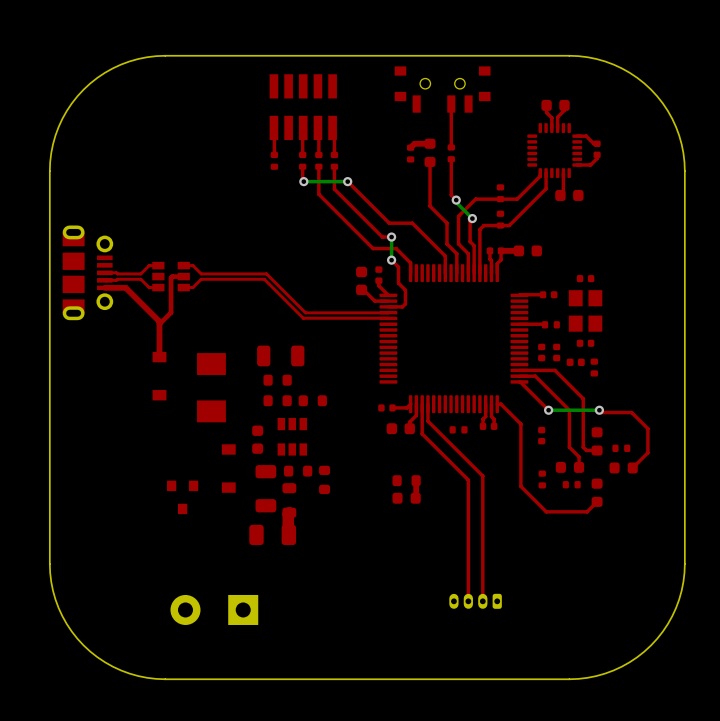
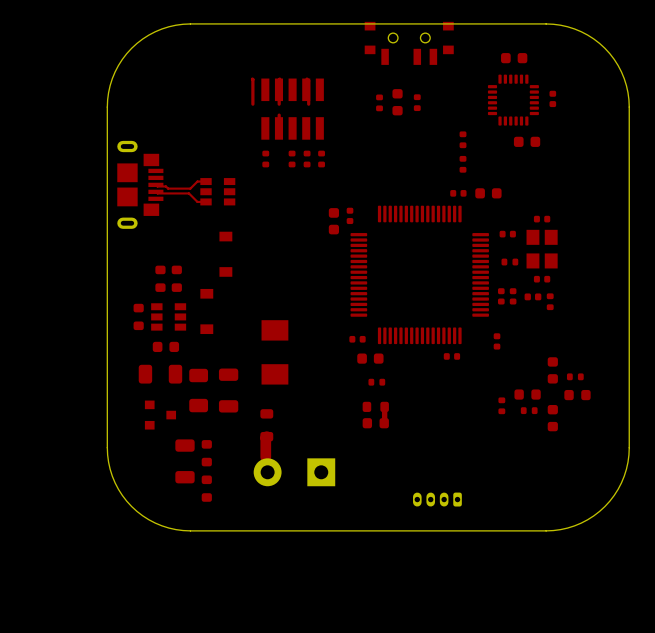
board edge: (569, 55) (156, 56) (129, 61) (112, 68) (97, 77) (77, 96) (58, 127) (50, 162) (49, 563) (51, 581) (58, 607) (71, 631) (90, 651) (121, 670) (156, 678) (569, 679) (587, 677) (613, 670) (637, 657) (657, 638) (676, 607) (684, 572) (683, 153) (676, 127) (667, 110) (644, 83) (613, 64) (587, 57) (569, 55) -> (546, 23) (574, 28) (599, 43) (618, 65) (627, 92) (628, 455) (621, 482) (609, 501) (599, 511) (581, 523) (567, 528) (546, 530) (183, 530) (162, 525) (137, 511) (122, 495) (115, 482) (108, 462) (107, 447) (107, 99) (112, 78) (126, 53) (148, 35) (168, 26) (183, 24) (546, 23)
top track: (451, 104) (451, 147) -> none
top track: (546, 105) (546, 112) (551, 117) (551, 128) -> none
top track: (564, 105) (564, 110) (557, 117) (557, 128) -> none
part: (303, 107) -> none
top track: (317, 127) (318, 154) -> none
top track: (577, 136) (586, 136) (593, 143) (597, 143) -> none
top track: (430, 143) (414, 143) (410, 147) -> none
part footprint: [315, 151, 323, 170] -> [261, 78, 324, 140]
top track: (597, 154) (597, 158) (590, 165) (577, 165) -> none
top track: (451, 159) (451, 195) (456, 200) -> none
part: (274, 160) -> none
part: (302, 160) -> none
part: (334, 160) -> none
top track: (430, 161) (430, 206) (447, 223) (447, 243) (456, 253) (456, 273) -> none
top track: (318, 166) (318, 194) (373, 248) (396, 248) (410, 263) (410, 273) -> none
top track: (334, 166) (334, 189) (382, 237) (391, 237) -> none
top track: (540, 173) (540, 176) (517, 199) (475, 199) (458, 216) (458, 243) (468, 253) (468, 273) -> none
top track: (546, 173) (546, 188) (509, 225) (483, 225) (479, 229) (479, 273) -> none
top track: (563, 173) (563, 192) (560, 195) -> none
via: (303, 181) -> none
top track: (347, 181) (389, 223) (412, 223) (445, 256) (445, 273) -> none
bottom track: (347, 181) (303, 181) -> none
via: (347, 181) -> none
bottom track: (456, 200) (456, 202) (472, 218) -> none
via: (456, 200) -> none
part: none -> (265, 159)
part: none -> (292, 159)
part: none -> (307, 159)
part: none -> (321, 159)
top track: (472, 218) (470, 220) (470, 241) (474, 245) (474, 273) -> none
via: (472, 218) -> none
bottom track: (391, 237) (391, 260) -> none
via: (391, 237) -> none
top track: none -> (206, 181) (197, 181) (190, 188) (168, 188) (155, 184)
part: none -> (140, 184)
top track: none -> (156, 191) (157, 193) (189, 193) (197, 201) (206, 201)
part: none -> (217, 191)
top track: (489, 250) (491, 273) -> none
top track: (518, 250) (501, 250) (501, 259) (497, 263) (497, 273) -> none
top track: (391, 260) (398, 267) (398, 283) (405, 290) (405, 304) (402, 306) (388, 306) -> none
via: (391, 260) -> none
top track: (158, 265) (149, 265) (140, 273) (104, 272) -> none
top track: (183, 265) (192, 265) (201, 273) (266, 273) (305, 312) (388, 312) -> none
part: (87, 272) -> none
part: (171, 276) -> none
top track: (183, 276) (171, 278) (171, 312) (159, 324) -> none
top track: (104, 280) (140, 279) (149, 287) (158, 287) -> none
top track: (378, 280) (378, 285) (388, 295) -> none
top track: (104, 287) (125, 287) (159, 321) (159, 357) -> none
top track: (183, 287) (192, 287) (201, 279) (264, 279) (303, 318) (388, 318) -> none
top track: (361, 289) (374, 301) (388, 301) -> none
top track: (543, 294) (519, 295) -> none
part: none -> (225, 254)
top track: (519, 324) (545, 324) -> none
part: none -> (160, 278)
part: none -> (176, 278)
part footprint: [152, 351, 167, 401] -> [133, 303, 144, 331]
part: (541, 352) -> none
part: (556, 352) -> none
part: (280, 355) -> none
part: none -> (501, 296)
part: none -> (513, 296)
top track: (519, 370) (554, 370) (583, 398) (583, 447) (586, 450) (597, 450) -> none
top track: (519, 376) (535, 376) (569, 410) (569, 447) (579, 456) (579, 467) -> none
part: none -> (206, 311)
part: (277, 380) -> none
top track: (519, 381) (548, 410) -> none
part: none -> (168, 316)
part position: (211, 387) -> (274, 352)
part: (277, 400) -> none
part: (312, 400) -> none
top track: (410, 404) (406, 407) (392, 407) -> none
top track: (416, 404) (416, 415) (409, 422) (409, 428) -> none
top track: (422, 404) (422, 433) (468, 480) (468, 601) -> none
top track: (427, 404) (427, 421) (482, 476) (482, 601) -> none
top track: (485, 404) (483, 426) -> none
top track: (491, 404) (494, 426) -> none
top track: (497, 404) (500, 404) (520, 424) (520, 486) (546, 511) (587, 511) (597, 501) -> none
via: (548, 410) -> none
top track: (599, 410) (601, 412) (631, 412) (647, 428) (647, 452) (632, 467) -> none
bottom track: (599, 410) (548, 410) -> none
via: (599, 410) -> none
part position: (458, 429) -> (376, 382)
part position: (541, 435) -> (497, 341)
part: (292, 436) -> none
part rotation: 0° (257, 439) -> 90° clockwise (165, 346)
part position: (257, 439) -> (165, 346)
part: none -> (160, 374)
part: none -> (198, 390)
part: (228, 468) -> none
part: (298, 471) -> none
part: (324, 479) -> none
part position: (265, 488) -> (228, 390)
part rotation: 0° (182, 497) -> 90° counterclockwise (160, 415)
part: none -> (206, 453)
part: (272, 534) -> none
part: none -> (185, 461)
part: none -> (206, 488)
part position: (475, 601) -> (437, 499)
part position: (214, 609) -> (294, 472)

